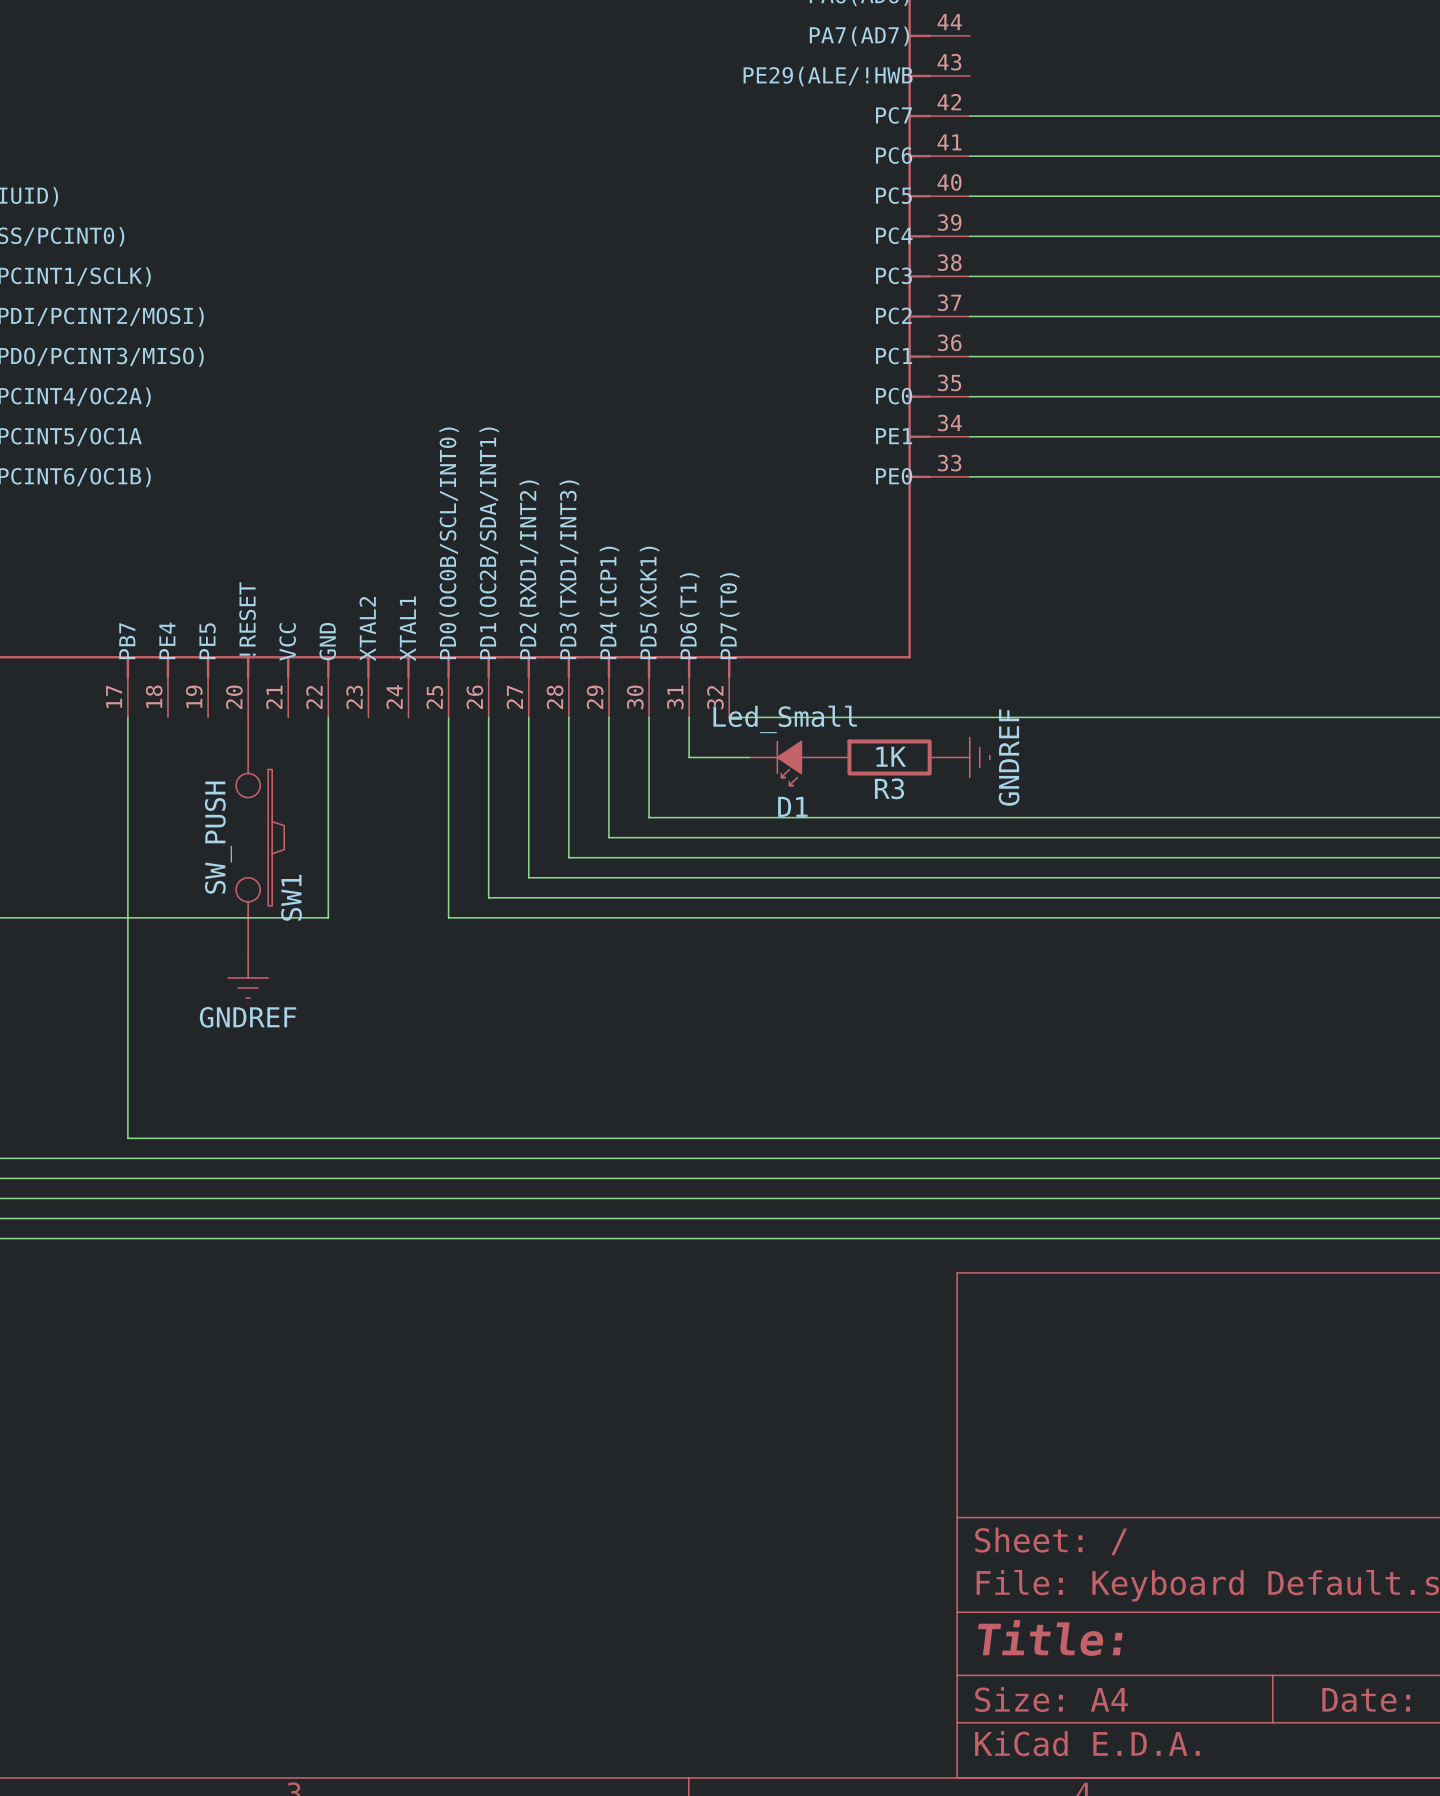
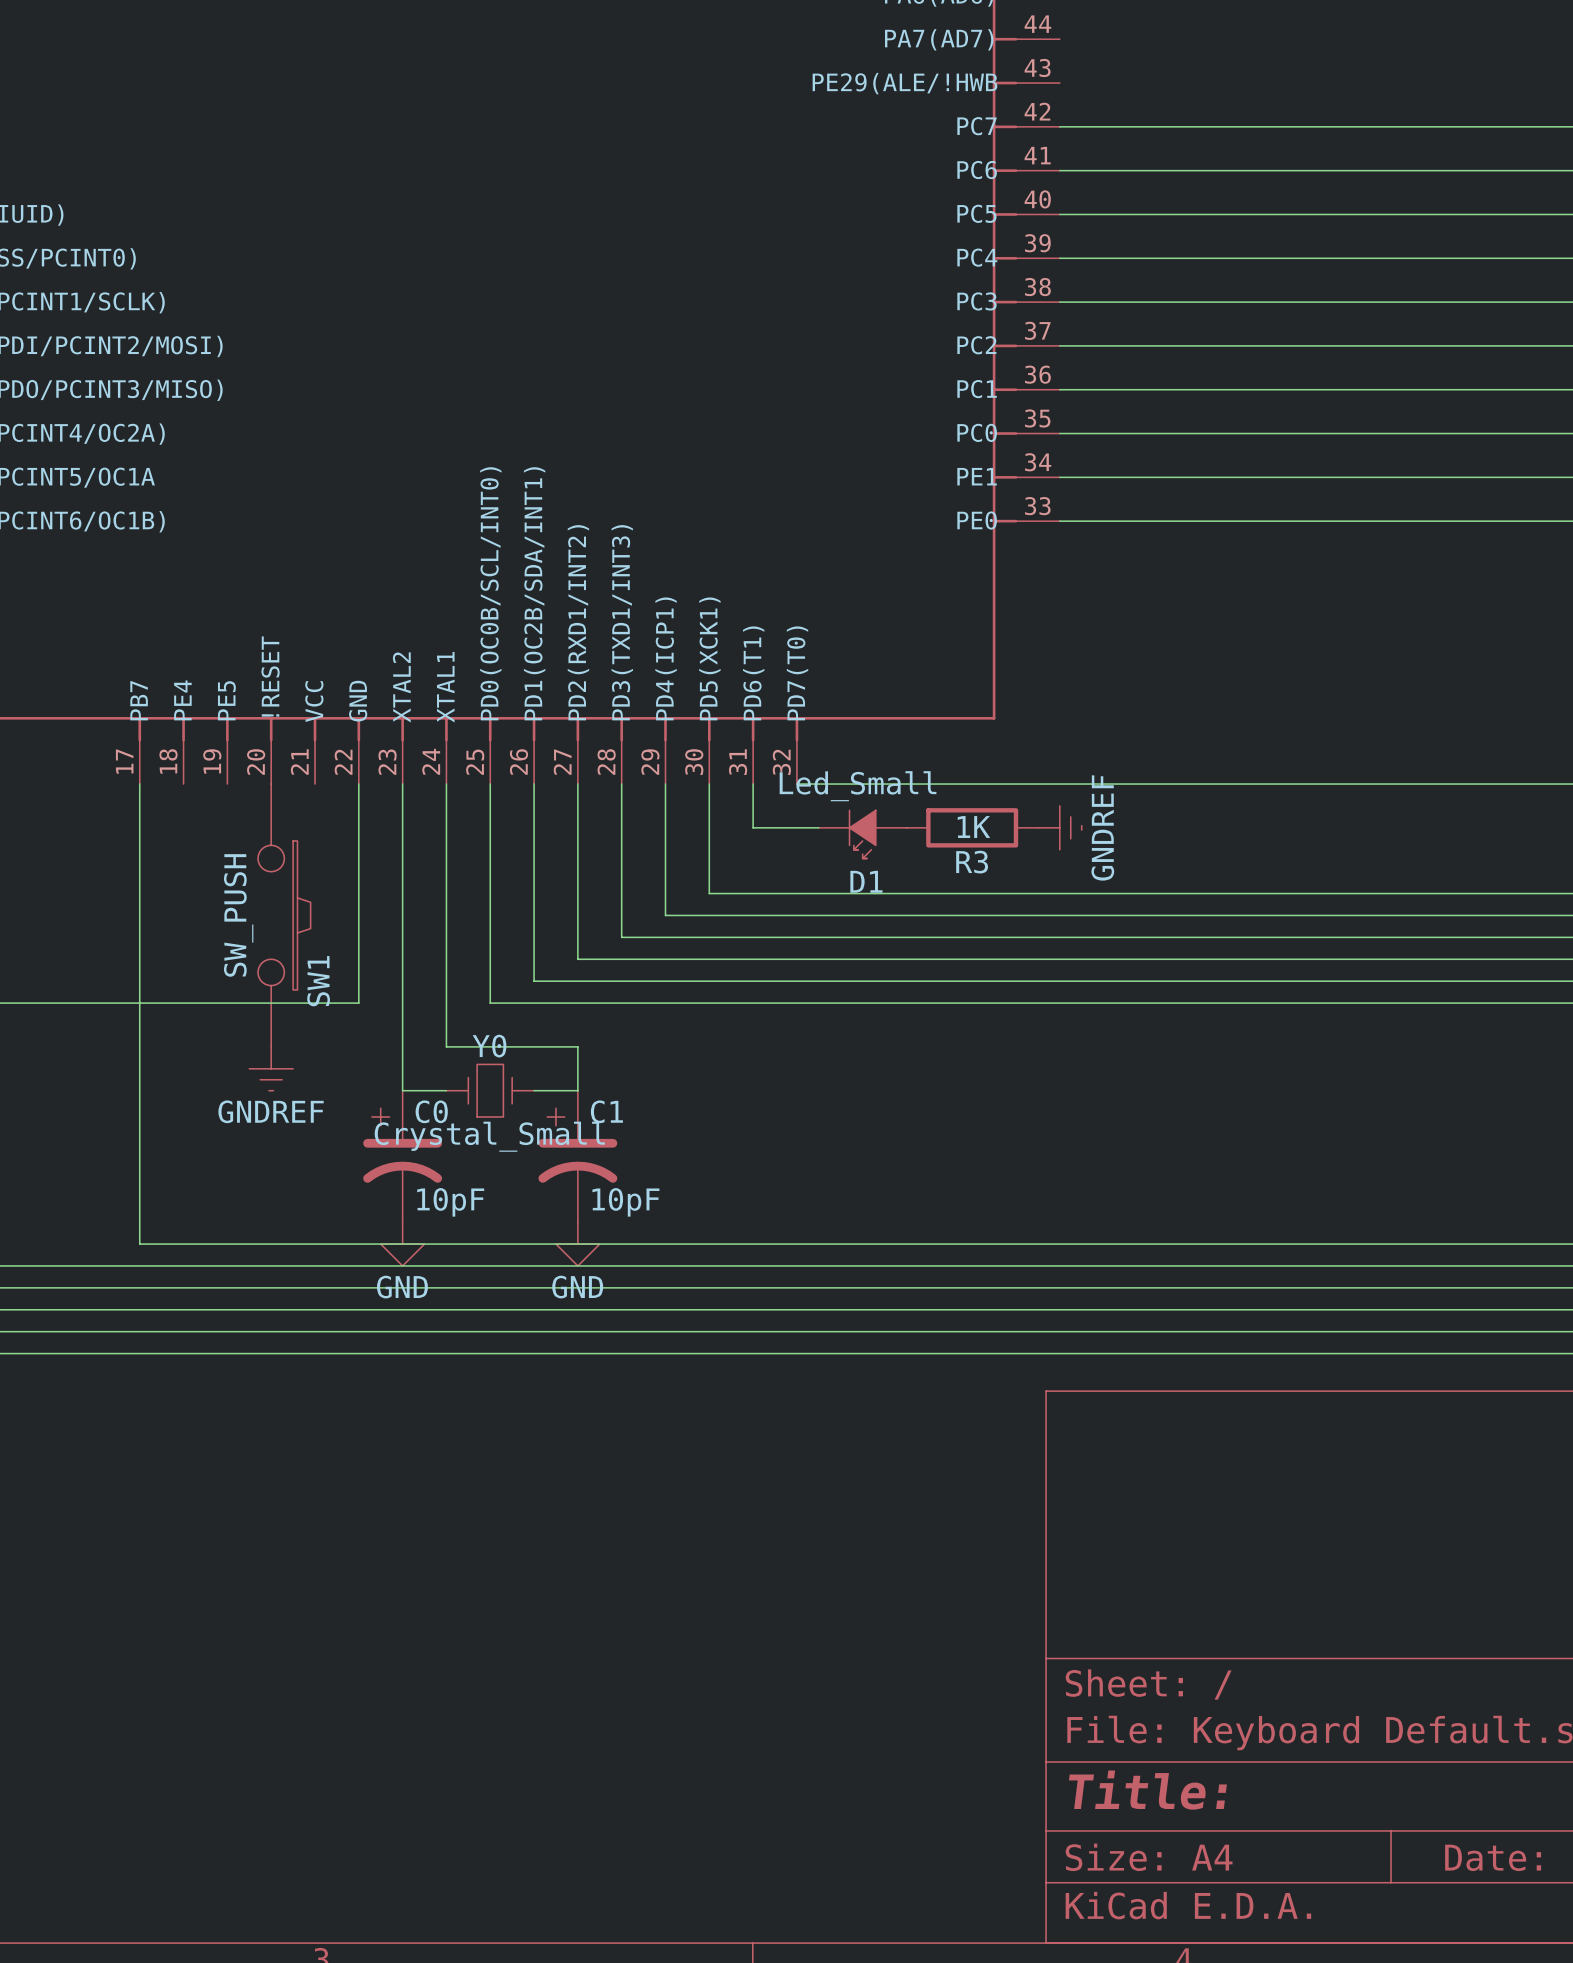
wire: none -> (402, 784) (402, 1090) (446, 1090)
wire: none -> (446, 784) (446, 1046) (577, 1046) (577, 1090) (534, 1090)
Y0: none -> Crystal_Small (490, 1090)
C0: none -> 10pF (402, 1156)
C1: none -> 10pF (577, 1156)
power symbol: none -> GND (402, 1244)
power symbol: none -> GND (577, 1244)

